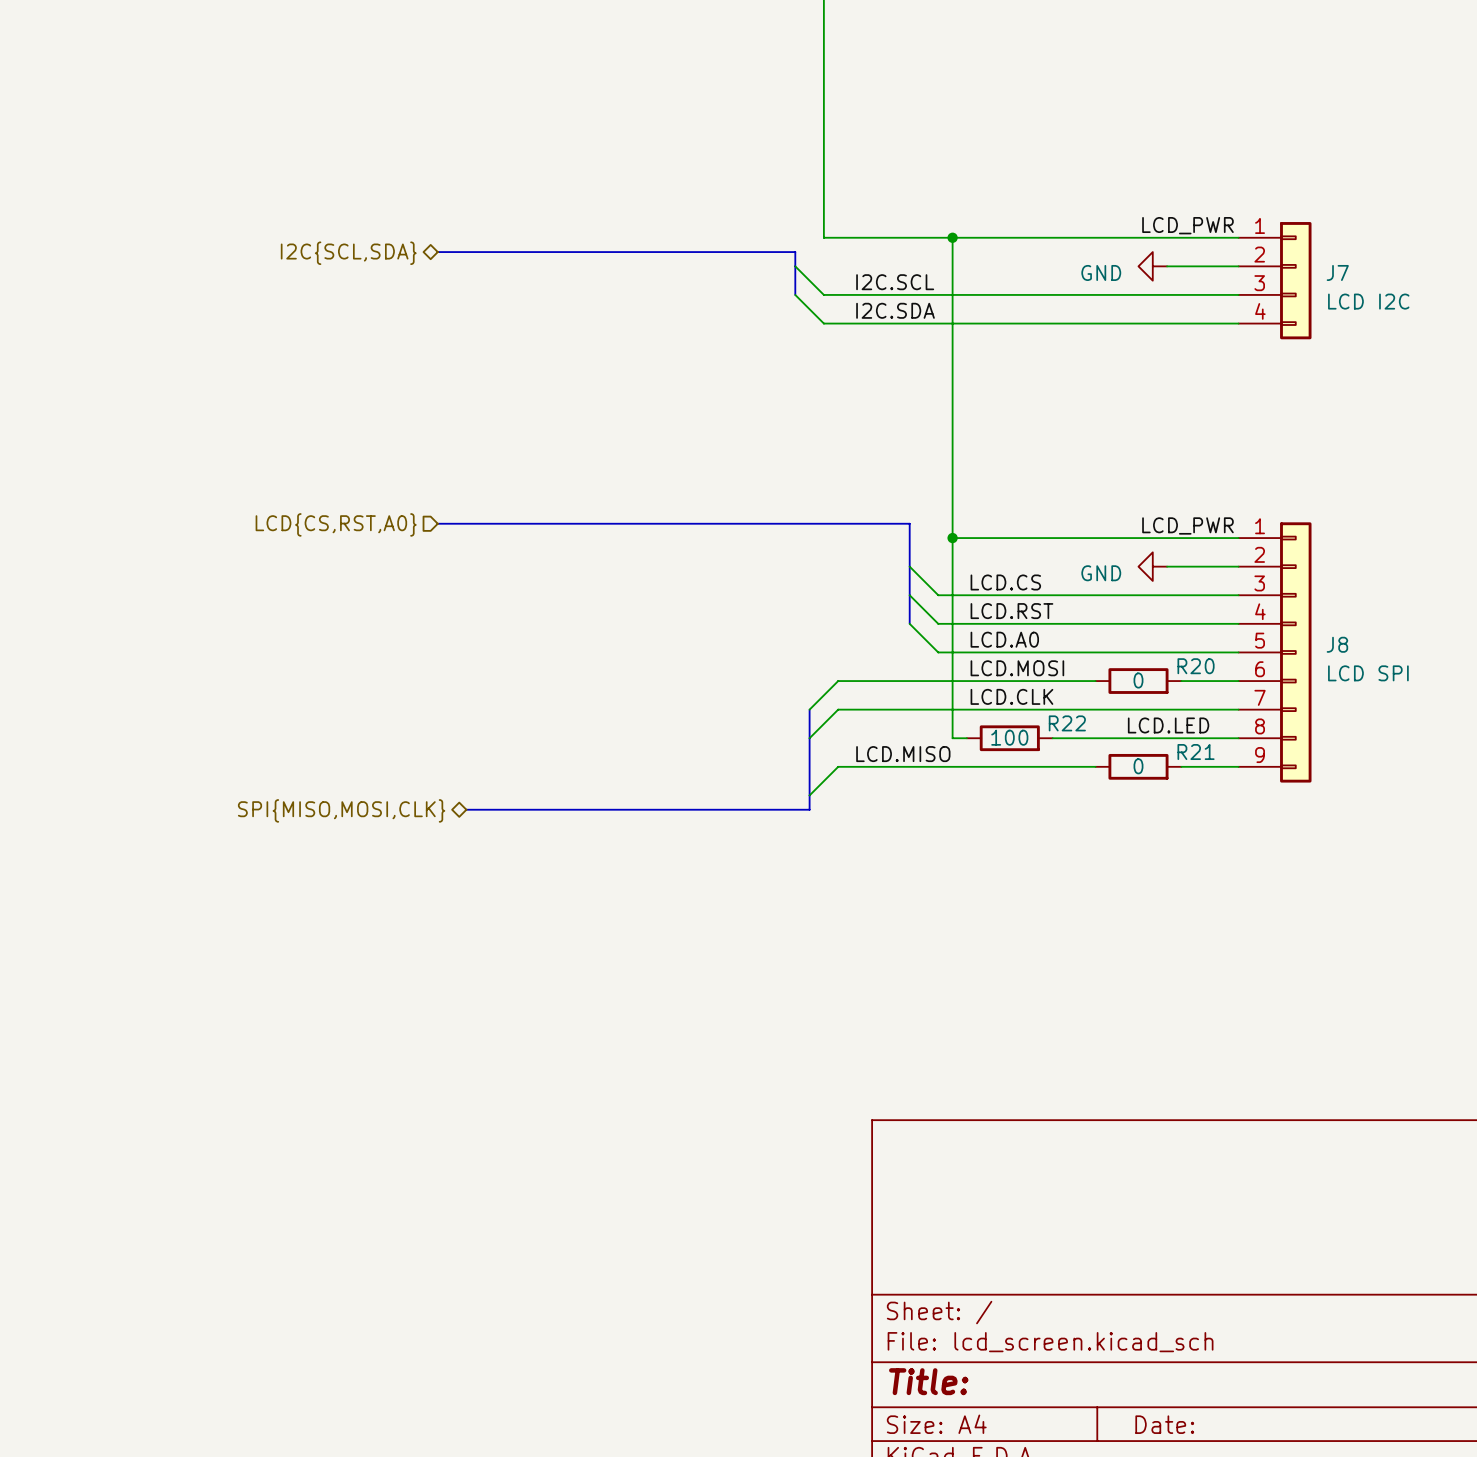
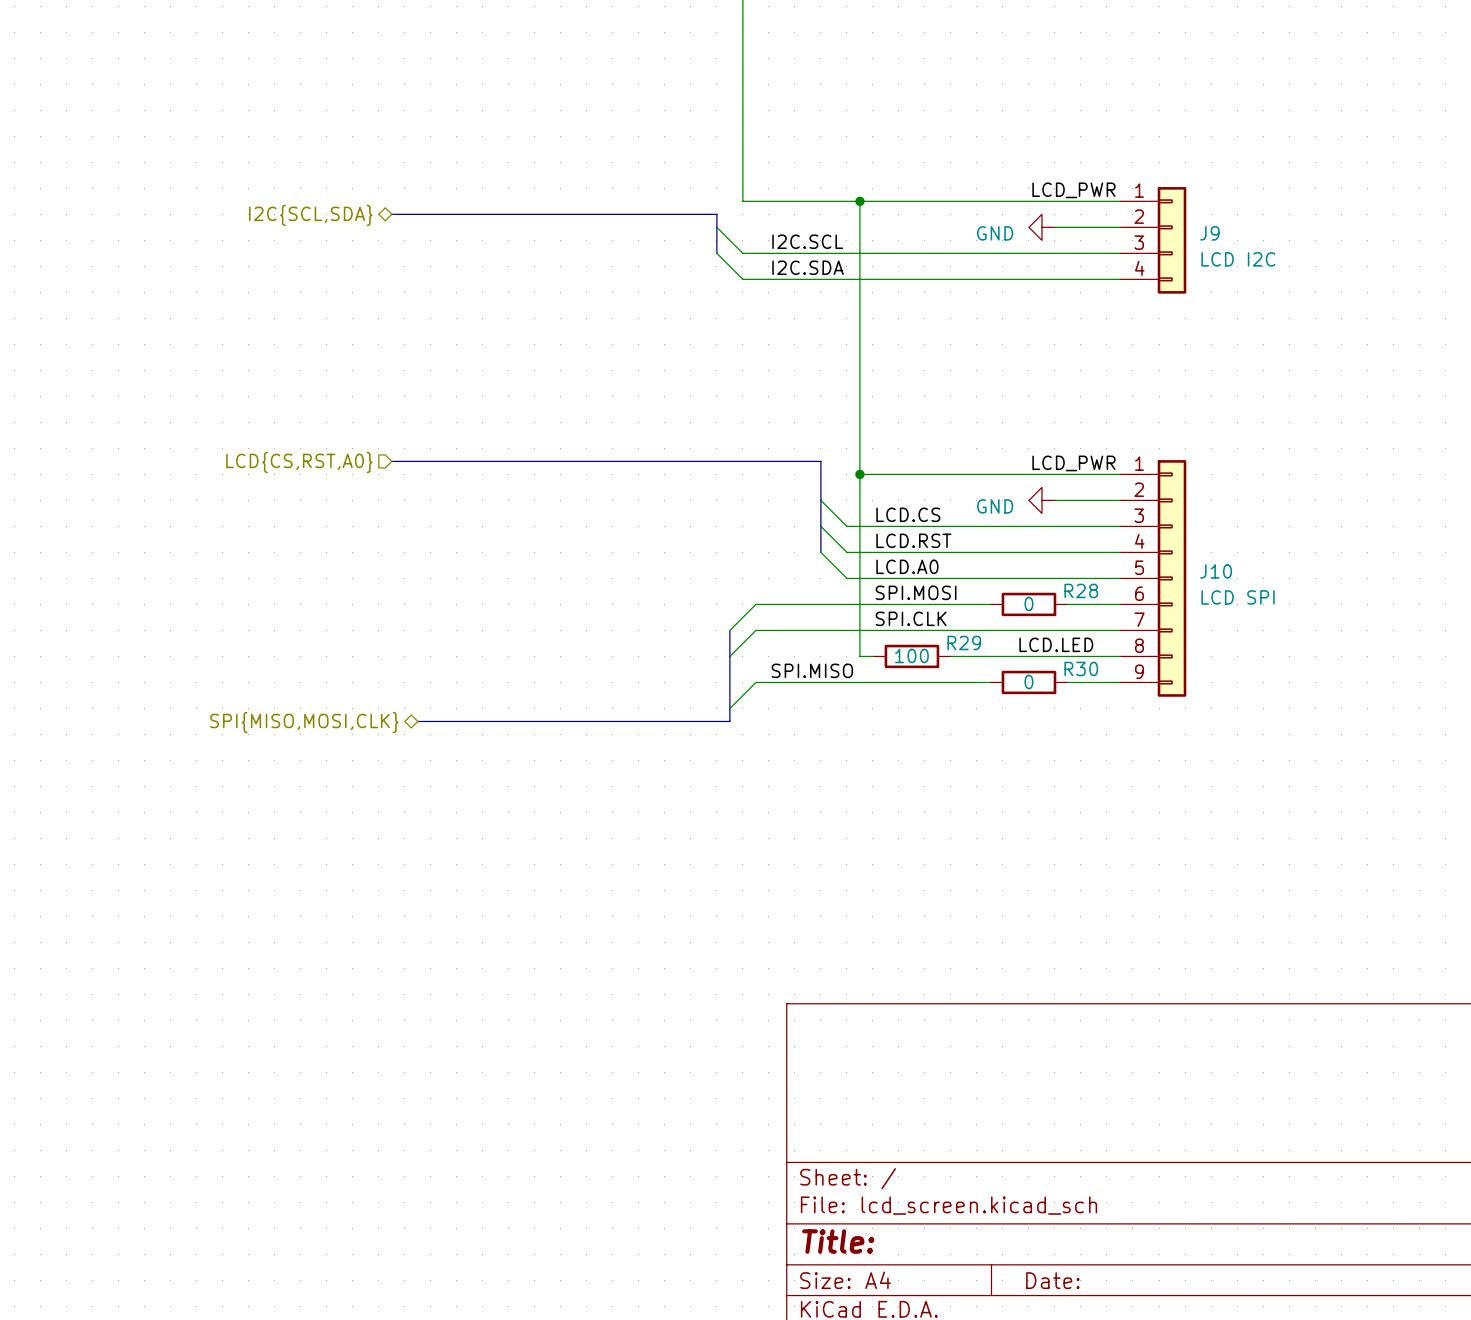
J7 name: J7 (1337, 272) -> J9 (1209, 233)
J8 name: J8 (1337, 644) -> J10 (1216, 571)
R20 name: R20 (1196, 666) -> R28 (1081, 590)
label: LCD.MOSI (1017, 668) -> SPI.MOSI (916, 592)
label: LCD.CLK (1011, 696) -> SPI.CLK (911, 618)
R22 name: R22 (1067, 723) -> R29 (964, 642)
R21 name: R21 (1196, 752) -> R30 (1081, 668)
label: LCD.MISO (903, 754) -> SPI.MISO (812, 670)

